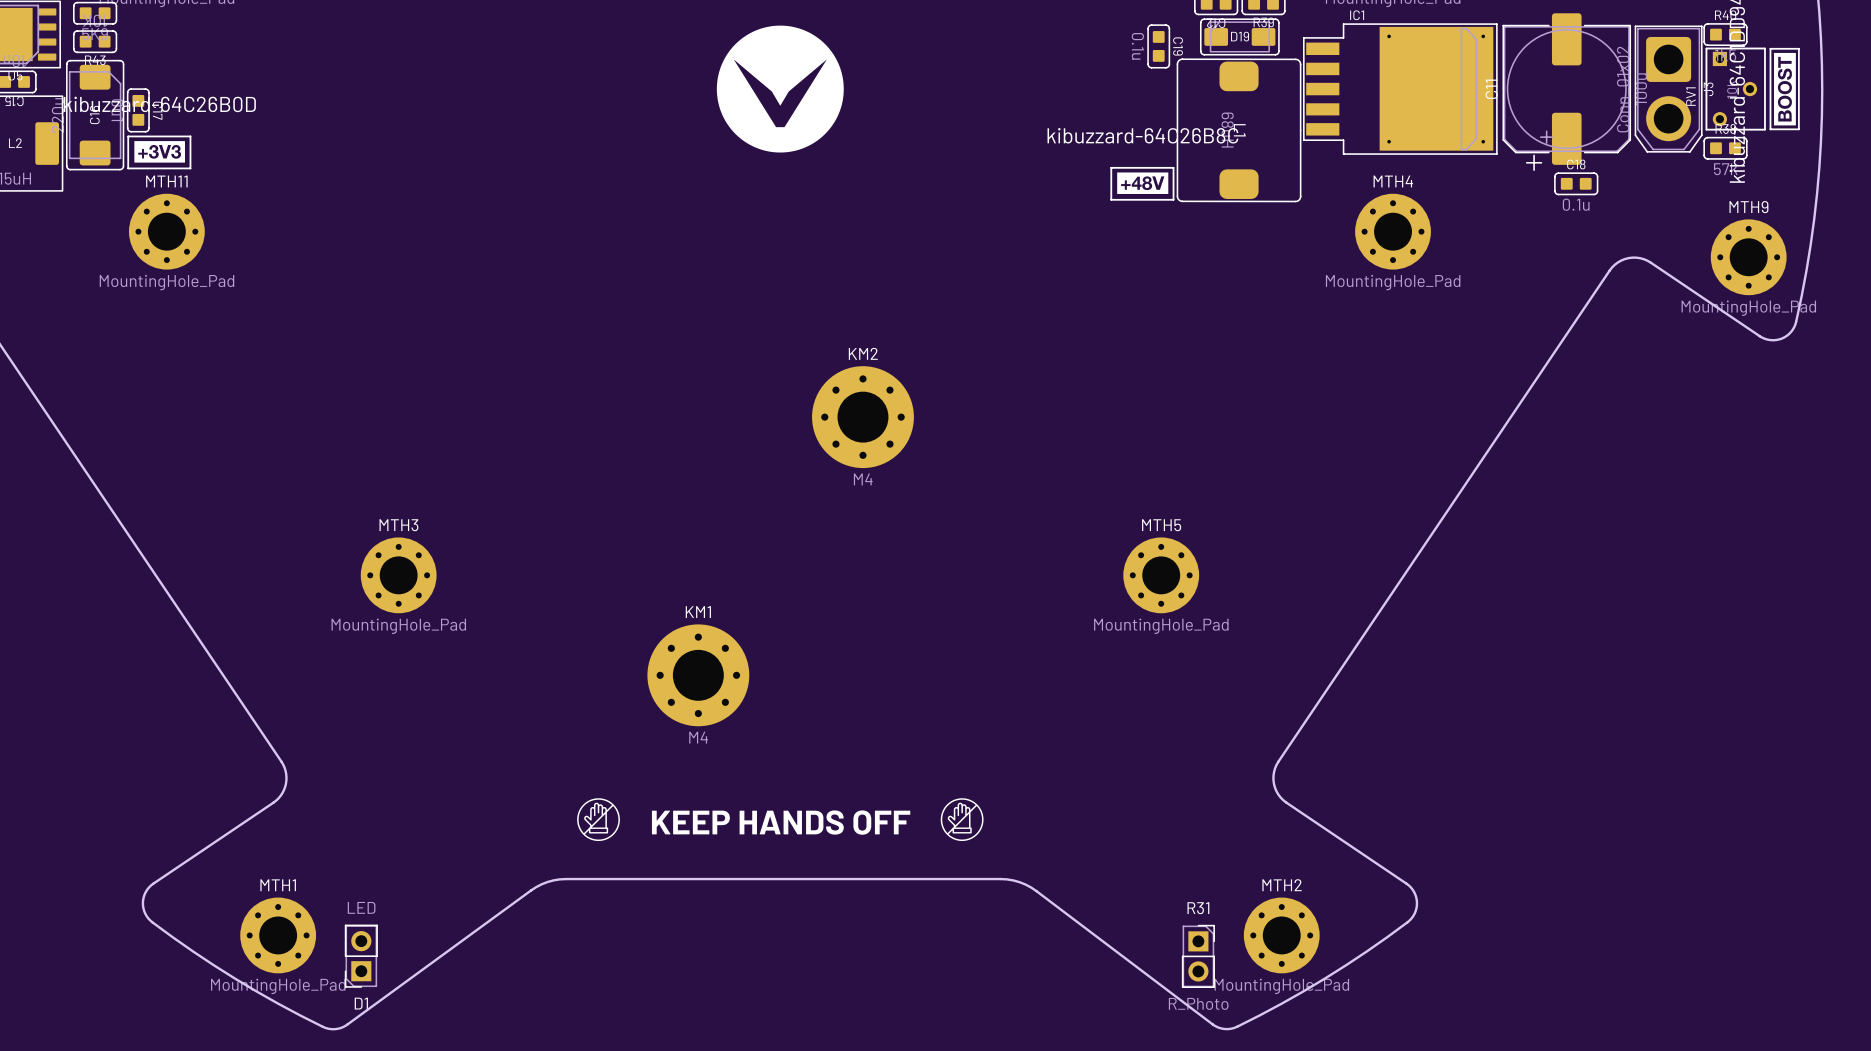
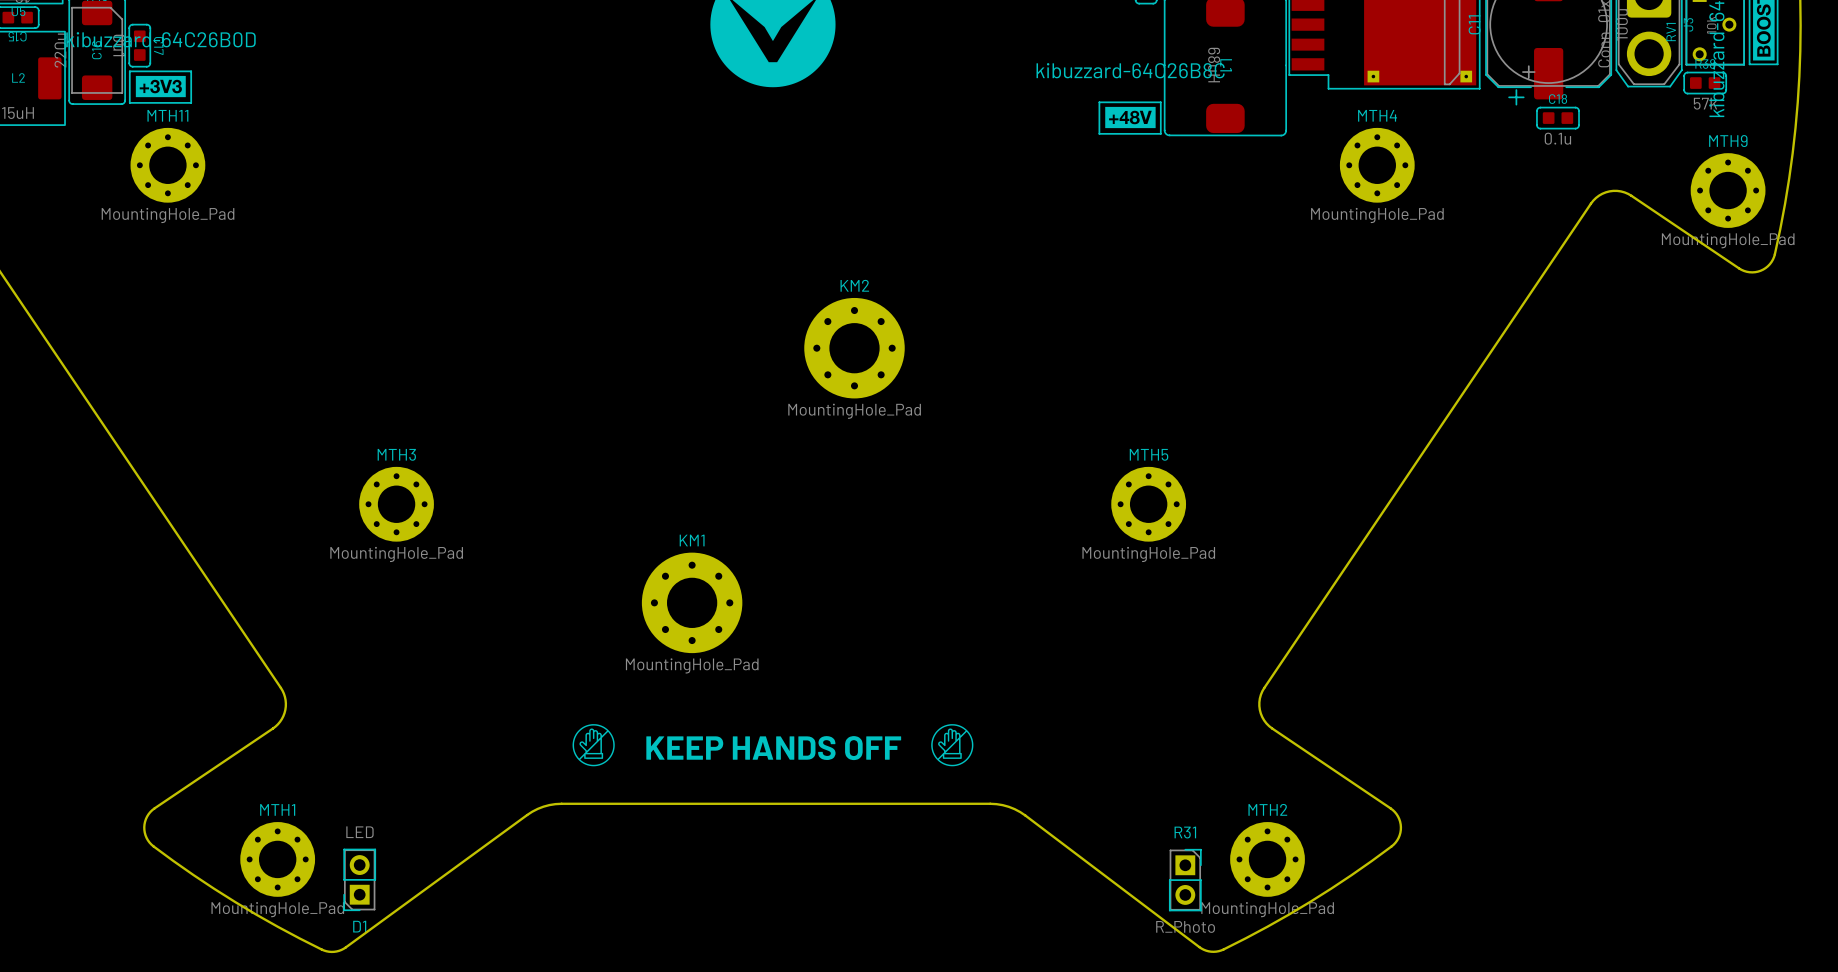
KM2 value: M4 (863, 479) -> MountingHole_Pad (854, 411)
KM1 value: M4 (698, 737) -> MountingHole_Pad (692, 665)

